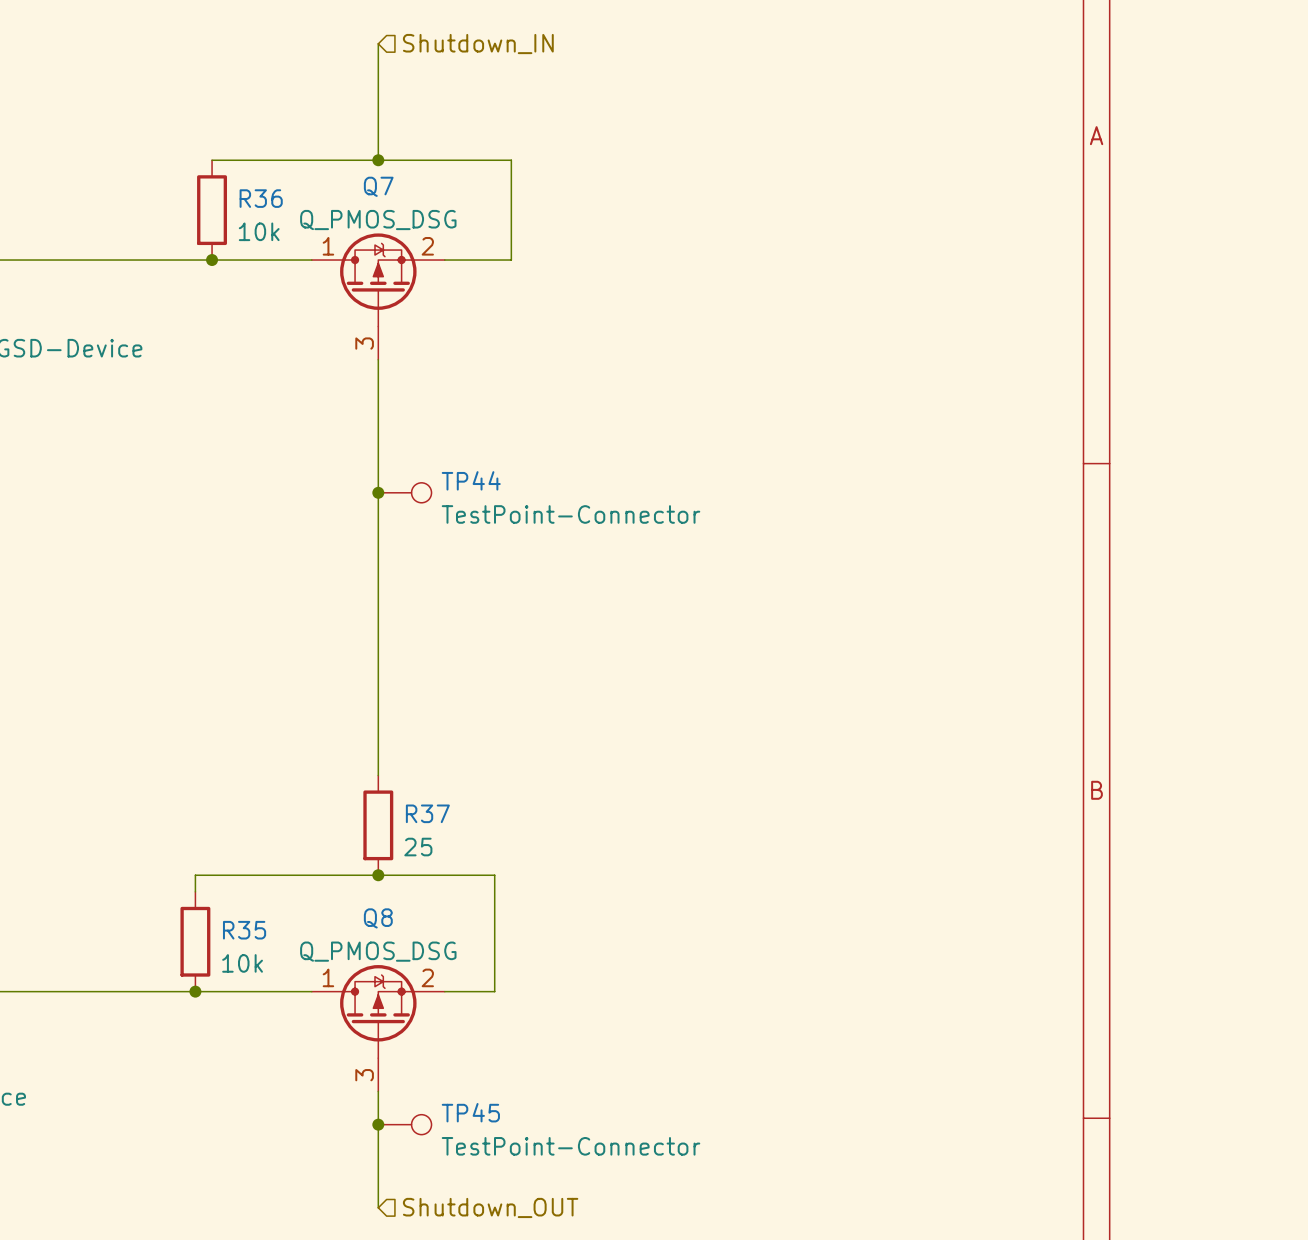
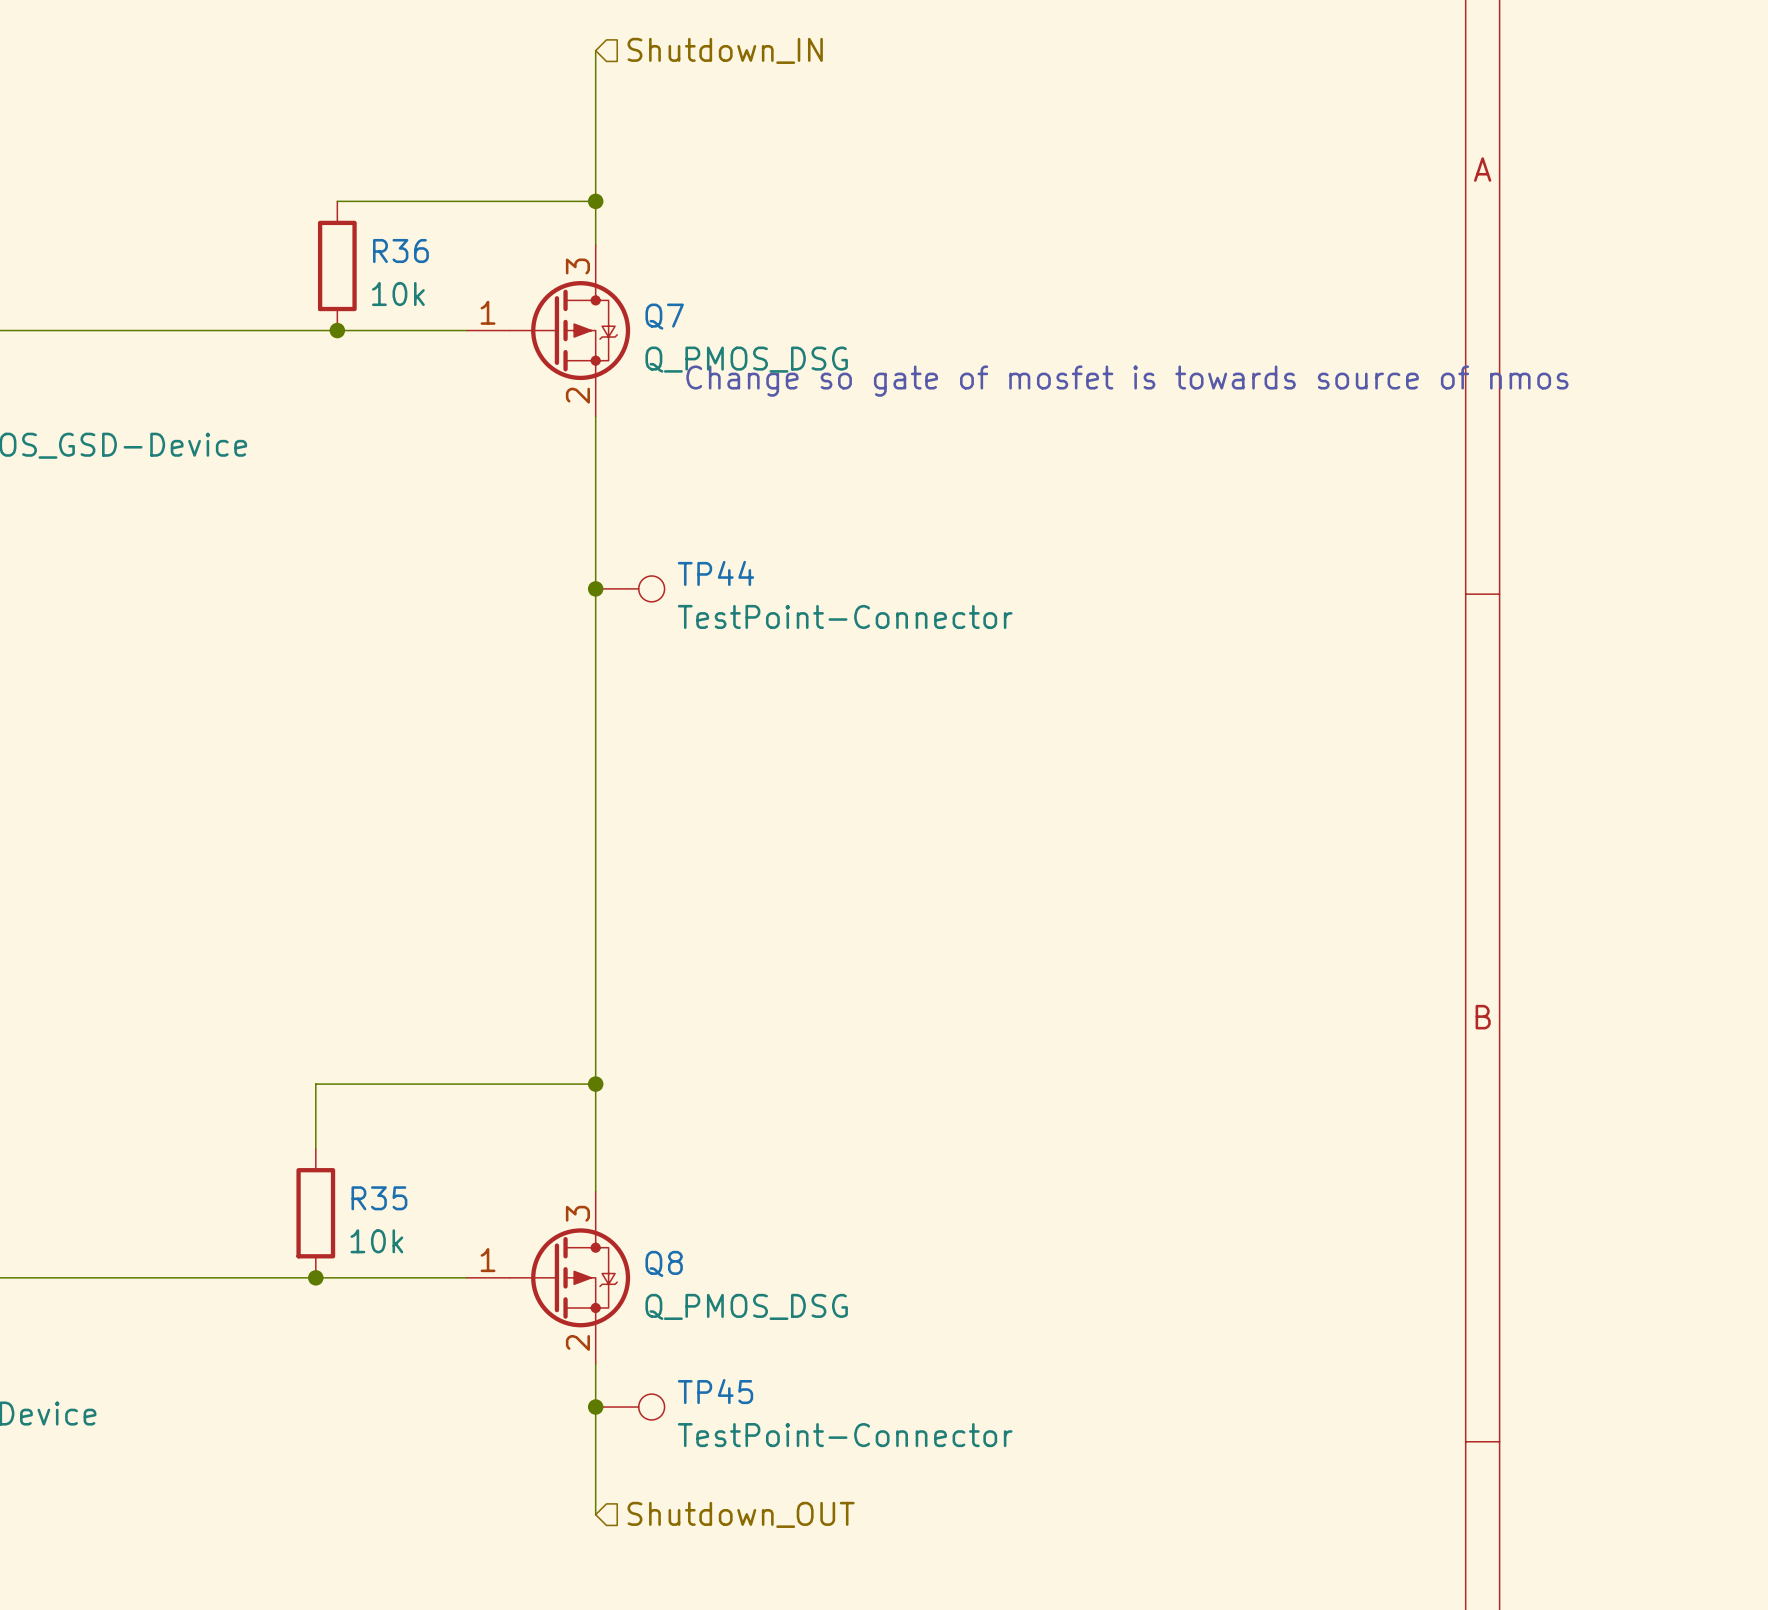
wire: (378, 43) (378, 160) -> none
wire: none -> (595, 50) (595, 244)
hierarchical label position: Shutdown_IN (478, 44) -> Shutdown_IN (725, 50)
junction position: (378, 160) -> (595, 201)
wire: (411, 160) (511, 160) (511, 260) (444, 260) -> none
Q7 name position: Q7 (378, 186) -> Q7 (664, 316)
Q7 value position: Q_PMOS_DSG (378, 220) -> Q_PMOS_DSG (746, 359)
Q7 symbol: [311, 233, 445, 360] -> [466, 244, 631, 417]
text: none -> Change so gate of mosfet is towards source of nmos (1127, 381)
wire: none -> (595, 416) (595, 1191)
wire: (378, 359) (378, 775) -> none
junction position: (378, 492) -> (595, 588)
TP44 position: (404, 492) -> (630, 588)
R37: 25 (378, 825) -> none
wire: (195, 875) (494, 875) (494, 991) (444, 991) -> (315, 1127) (315, 1084) (595, 1084)
junction position: (378, 875) -> (595, 1084)
Q8 name position: Q8 (378, 918) -> Q8 (664, 1263)
Q8 value position: Q_PMOS_DSG (378, 951) -> Q_PMOS_DSG (746, 1306)
Q8 symbol: [311, 965, 445, 1092] -> [466, 1191, 631, 1364]
wire: (378, 1091) (378, 1207) -> (595, 1363) (595, 1514)
junction position: (378, 1124) -> (595, 1407)
TP45 position: (404, 1124) -> (630, 1407)
hierarchical label position: Shutdown_OUT (490, 1207) -> Shutdown_OUT (741, 1514)

